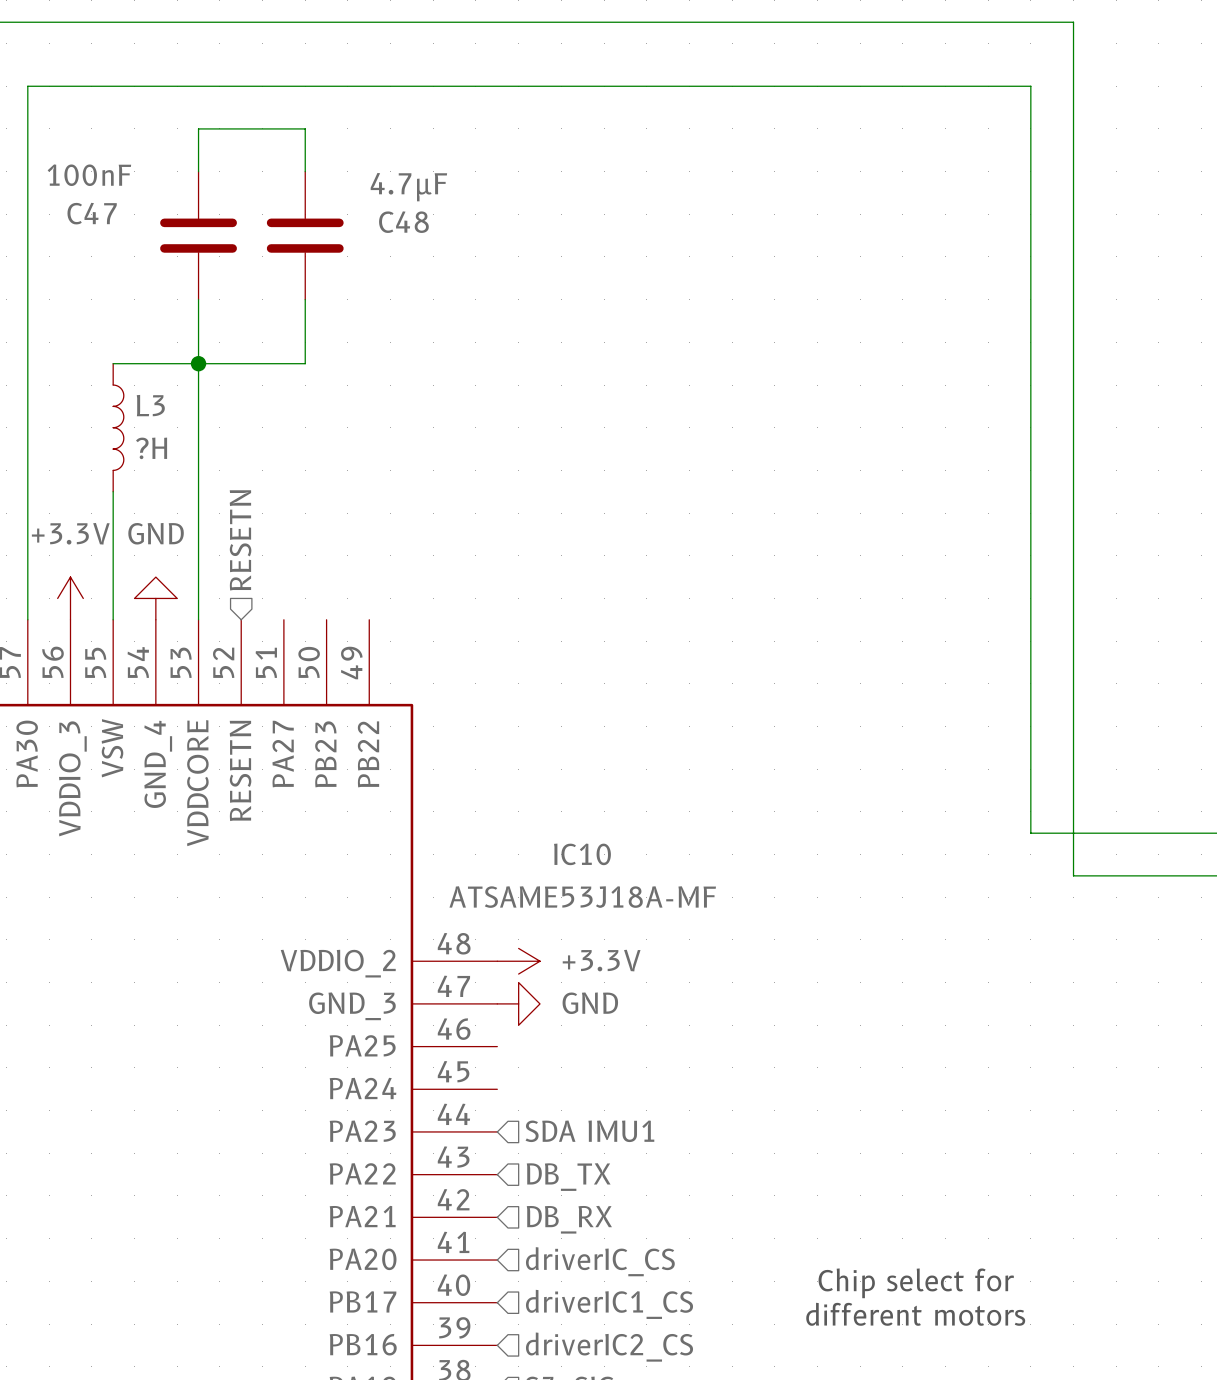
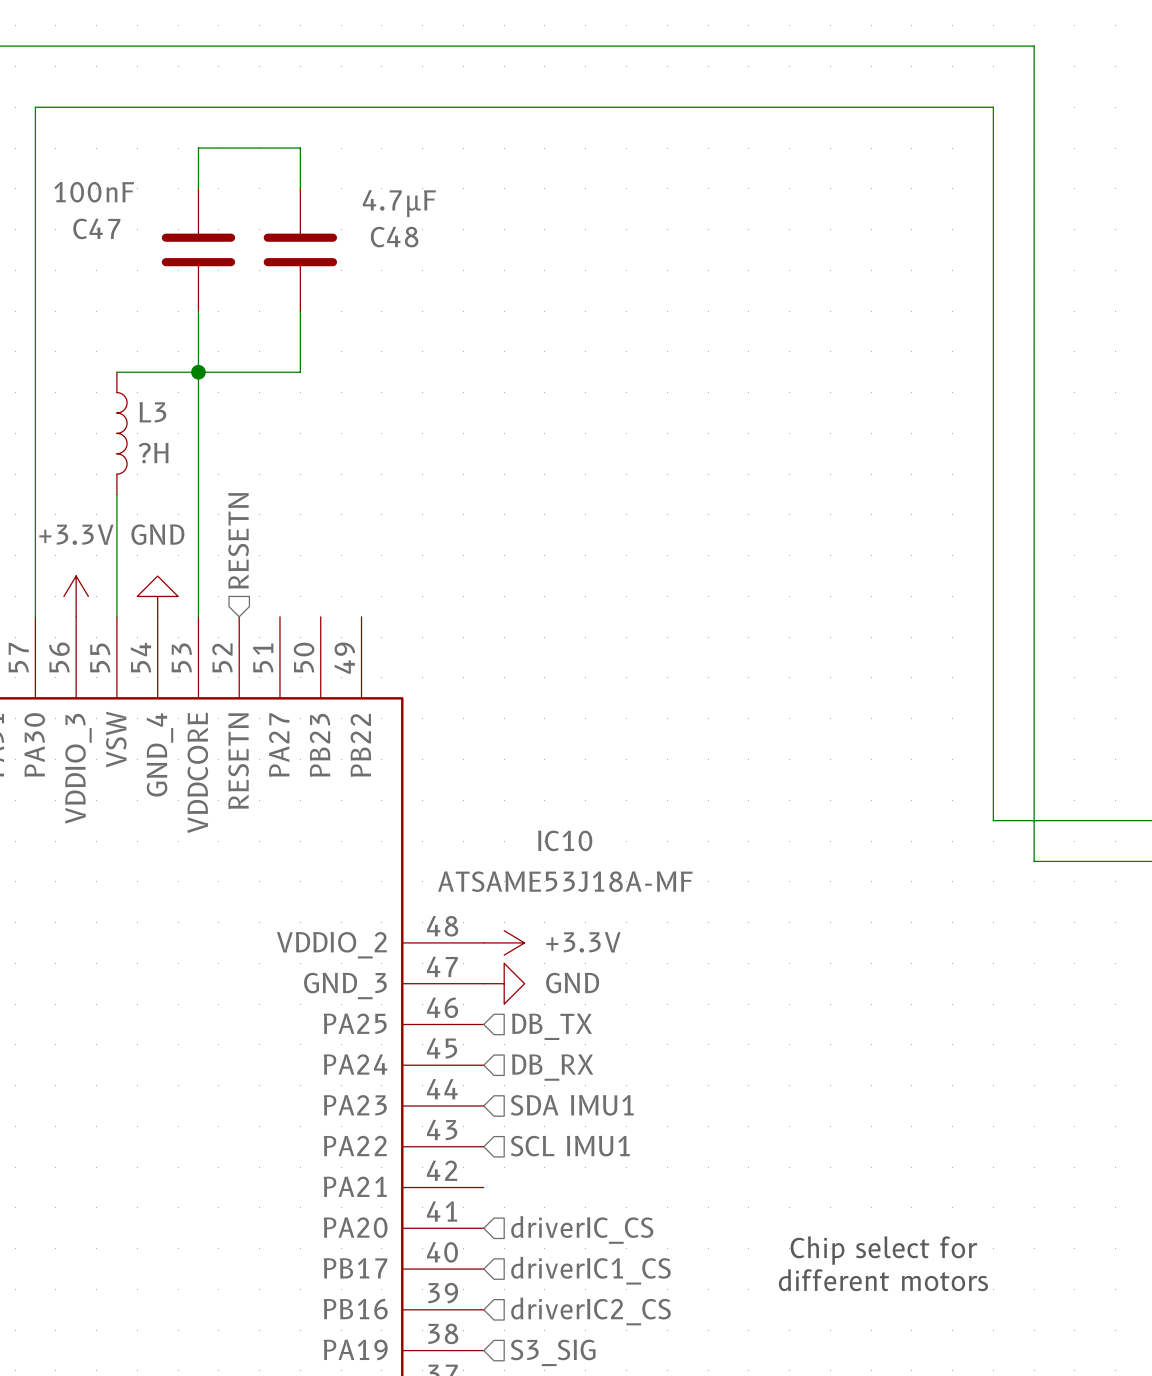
hierarchical label: none -> DB_TX (551, 1026)
hierarchical label: DB_TX (568, 1177) -> SCL IMU1 (570, 1146)
hierarchical label position: DB_RX (569, 1219) -> DB_RX (552, 1067)

